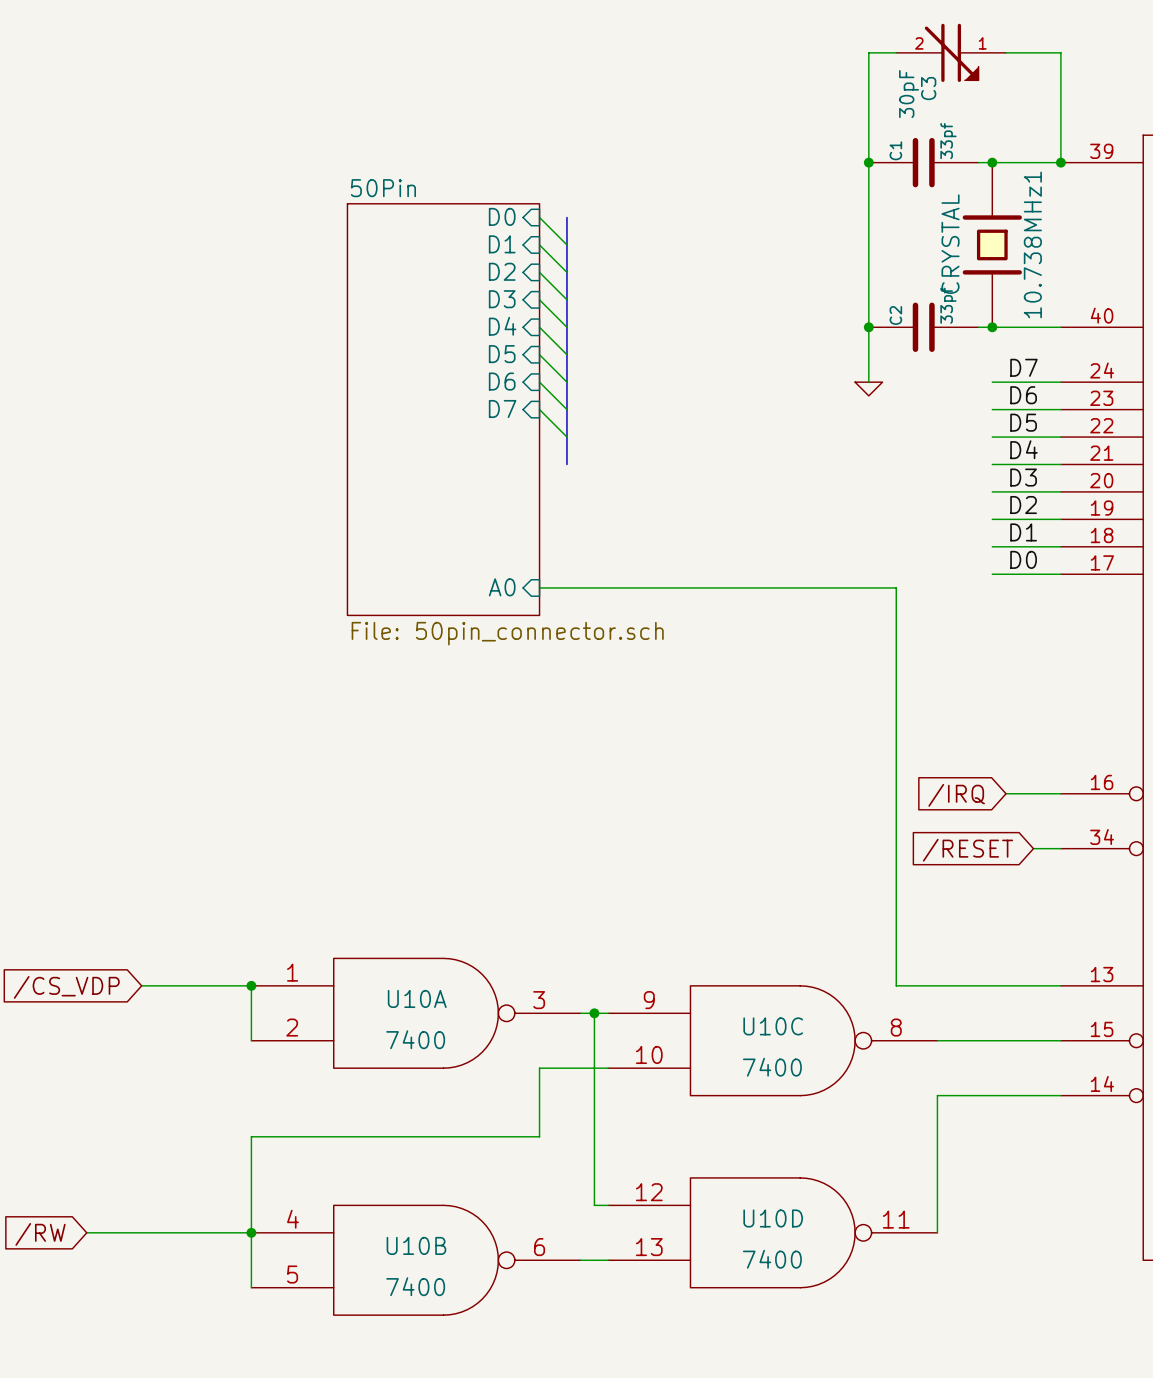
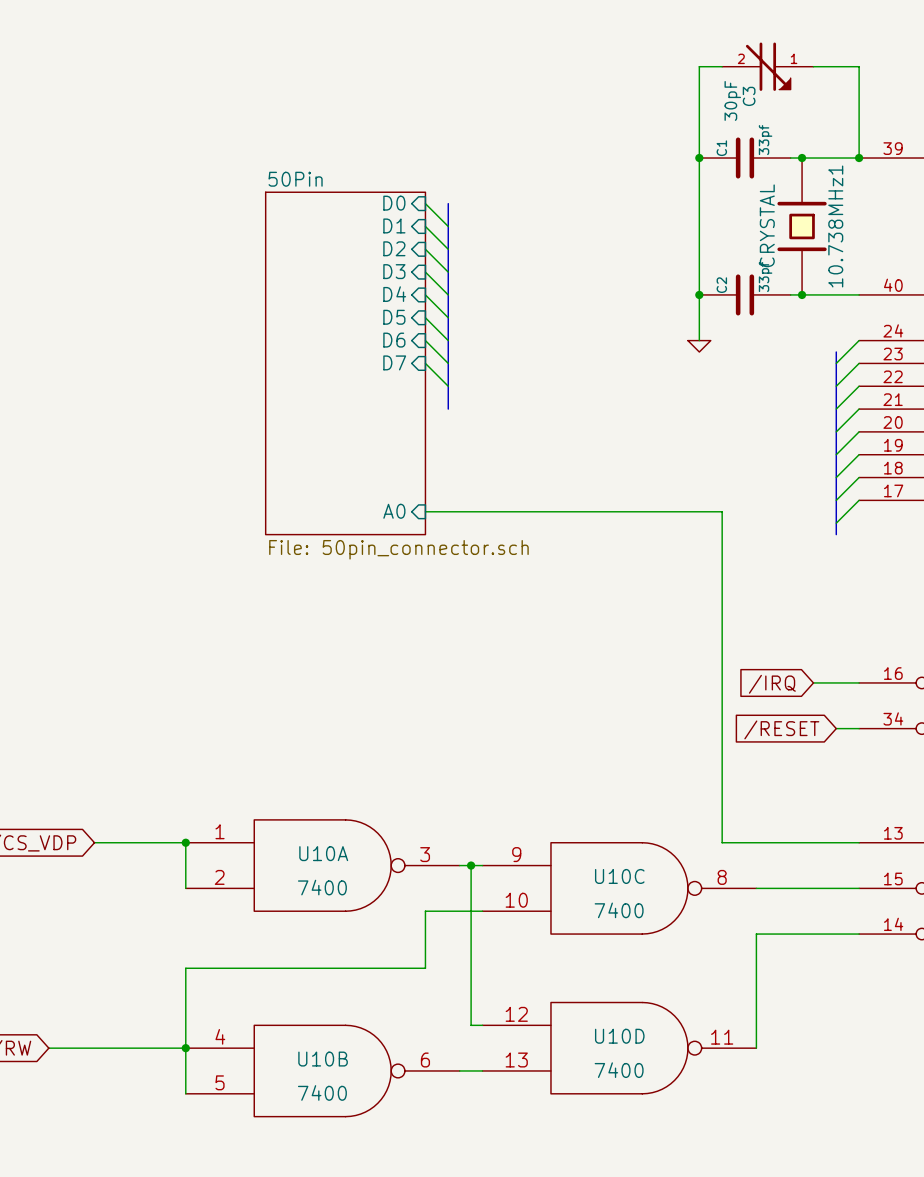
label: D7 (1023, 367) -> none
wire: (992, 382) (1060, 382) -> (836, 363) (859, 340)
label: D6 (1023, 395) -> none
bus: none -> (836, 352) (836, 534)
wire: (992, 409) (1060, 409) -> (836, 386) (859, 363)
label: D5 (1023, 422) -> none
wire: (992, 437) (1060, 437) -> (836, 409) (859, 386)
label: D4 (1023, 449) -> none
wire: (992, 464) (1060, 464) -> (836, 431) (859, 409)
label: D3 (1023, 477) -> none
wire: (992, 491) (1060, 491) -> (836, 454) (859, 431)
label: D2 (1023, 505) -> none
wire: (992, 519) (1060, 519) -> (836, 477) (859, 454)
label: D1 (1023, 532) -> none
wire: (992, 546) (1060, 546) -> (836, 500) (859, 477)
label: D0 (1023, 559) -> none
wire: (992, 574) (1060, 574) -> (836, 523) (859, 500)

